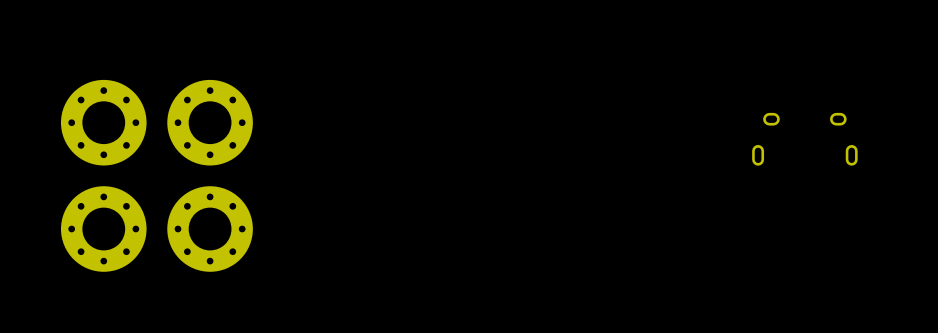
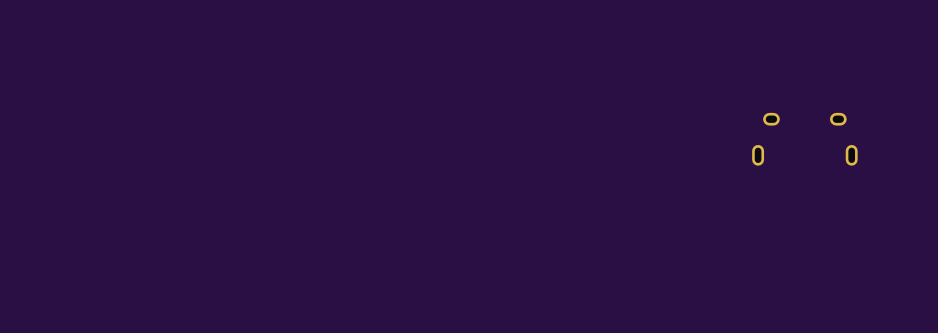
part: (103, 122) -> none
part: (210, 122) -> none
part: (103, 229) -> none
part: (210, 229) -> none

